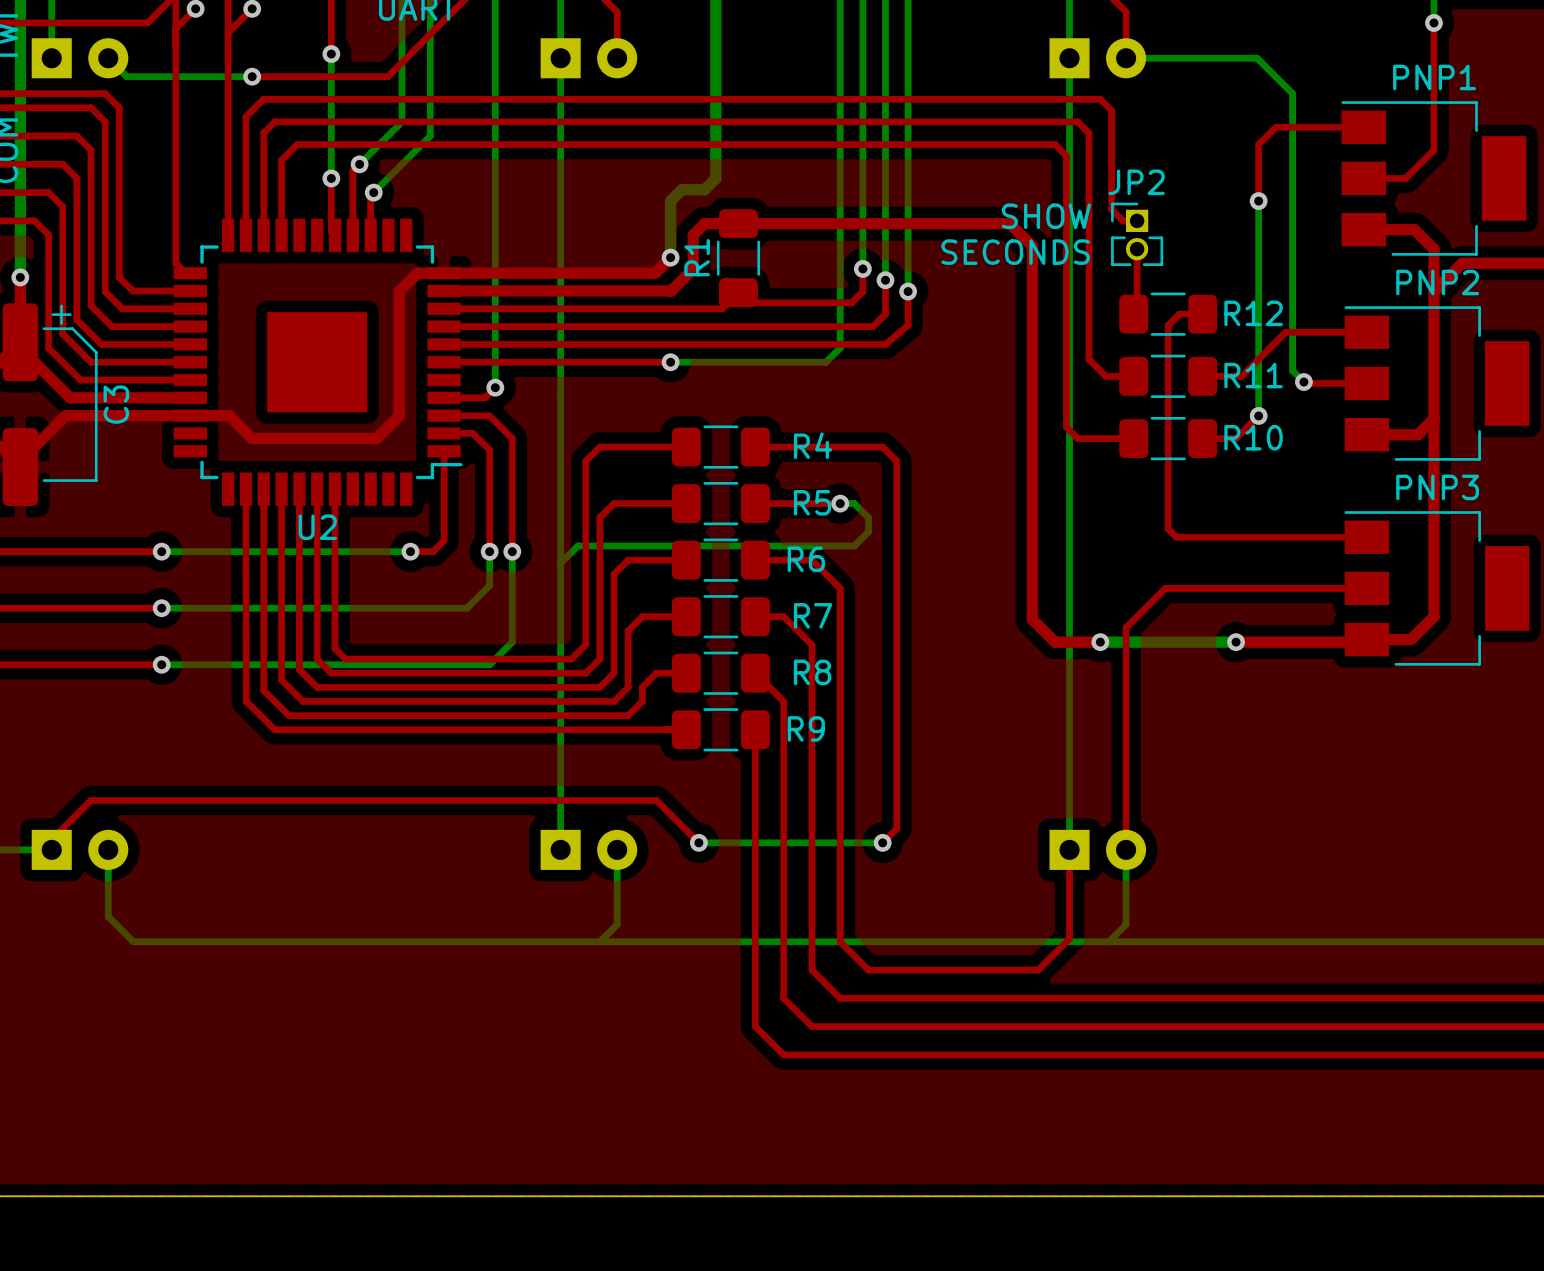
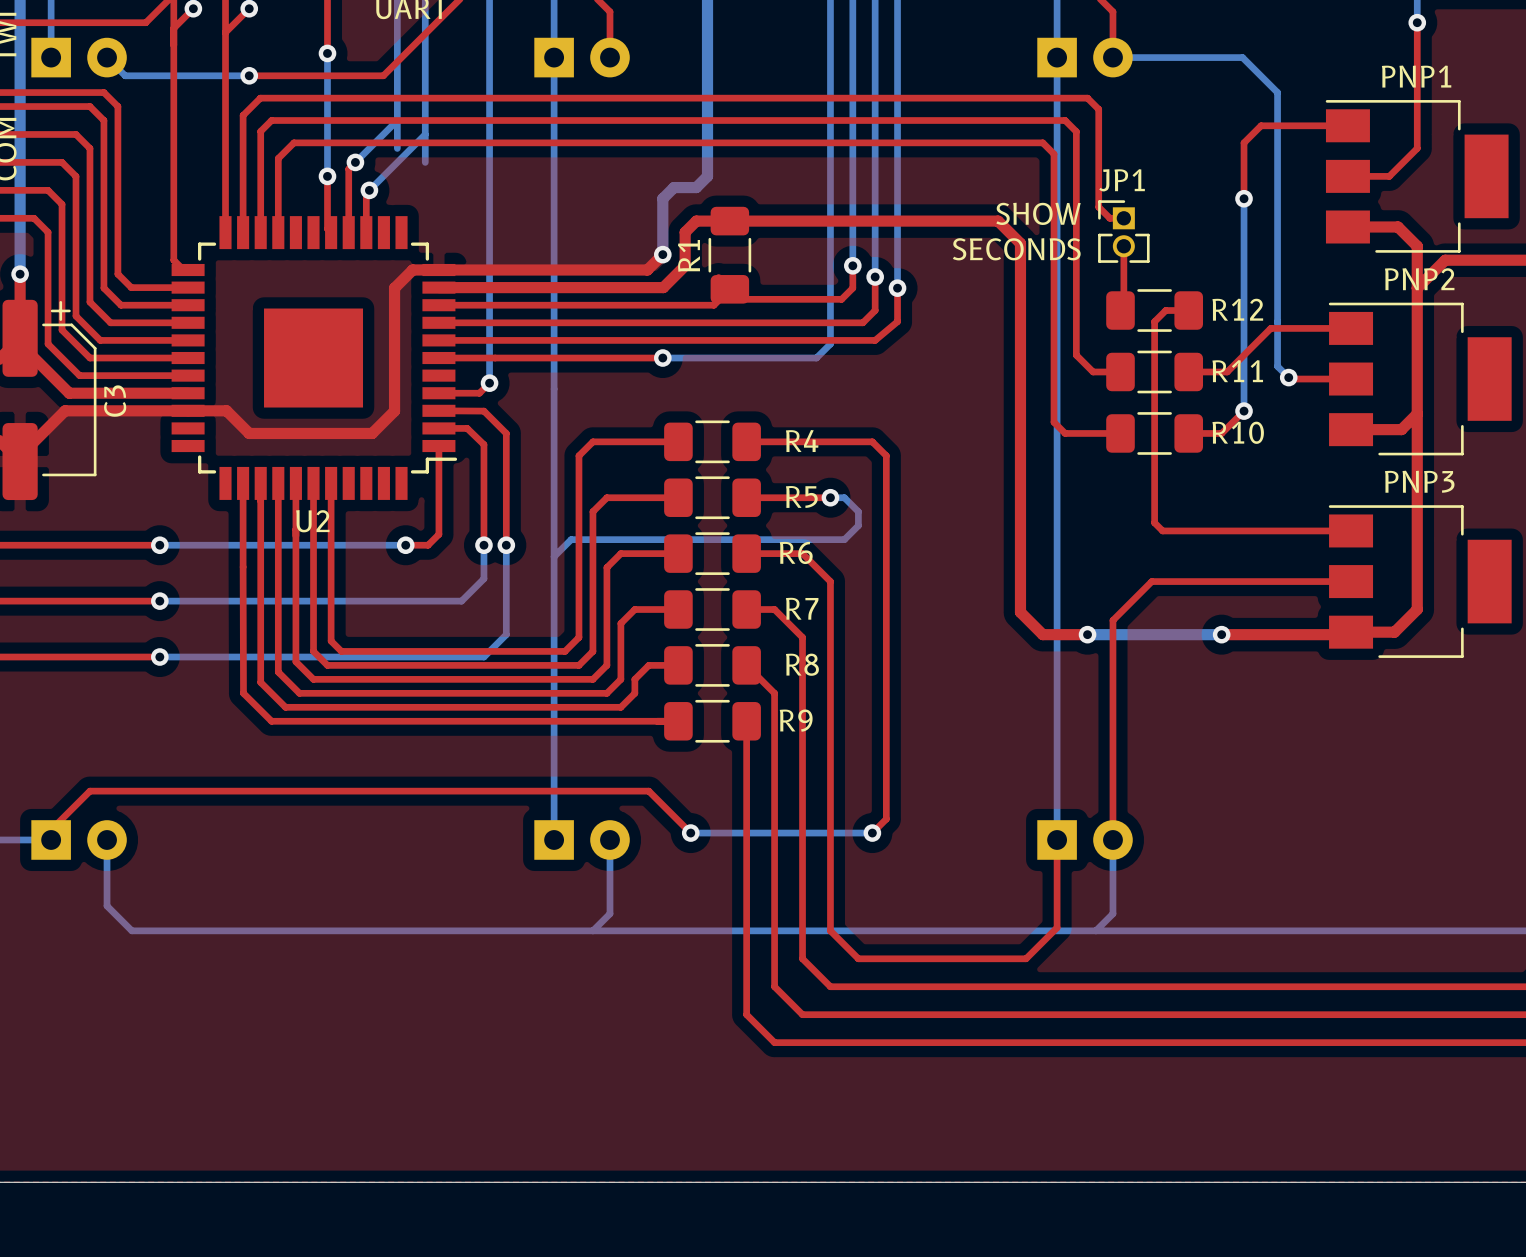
bottom track: none -> (397, 120) (397, 148)
bottom track: none -> (425, 134) (425, 162)
JP2 name: JP2 (1136, 182) -> JP1 (1122, 180)

